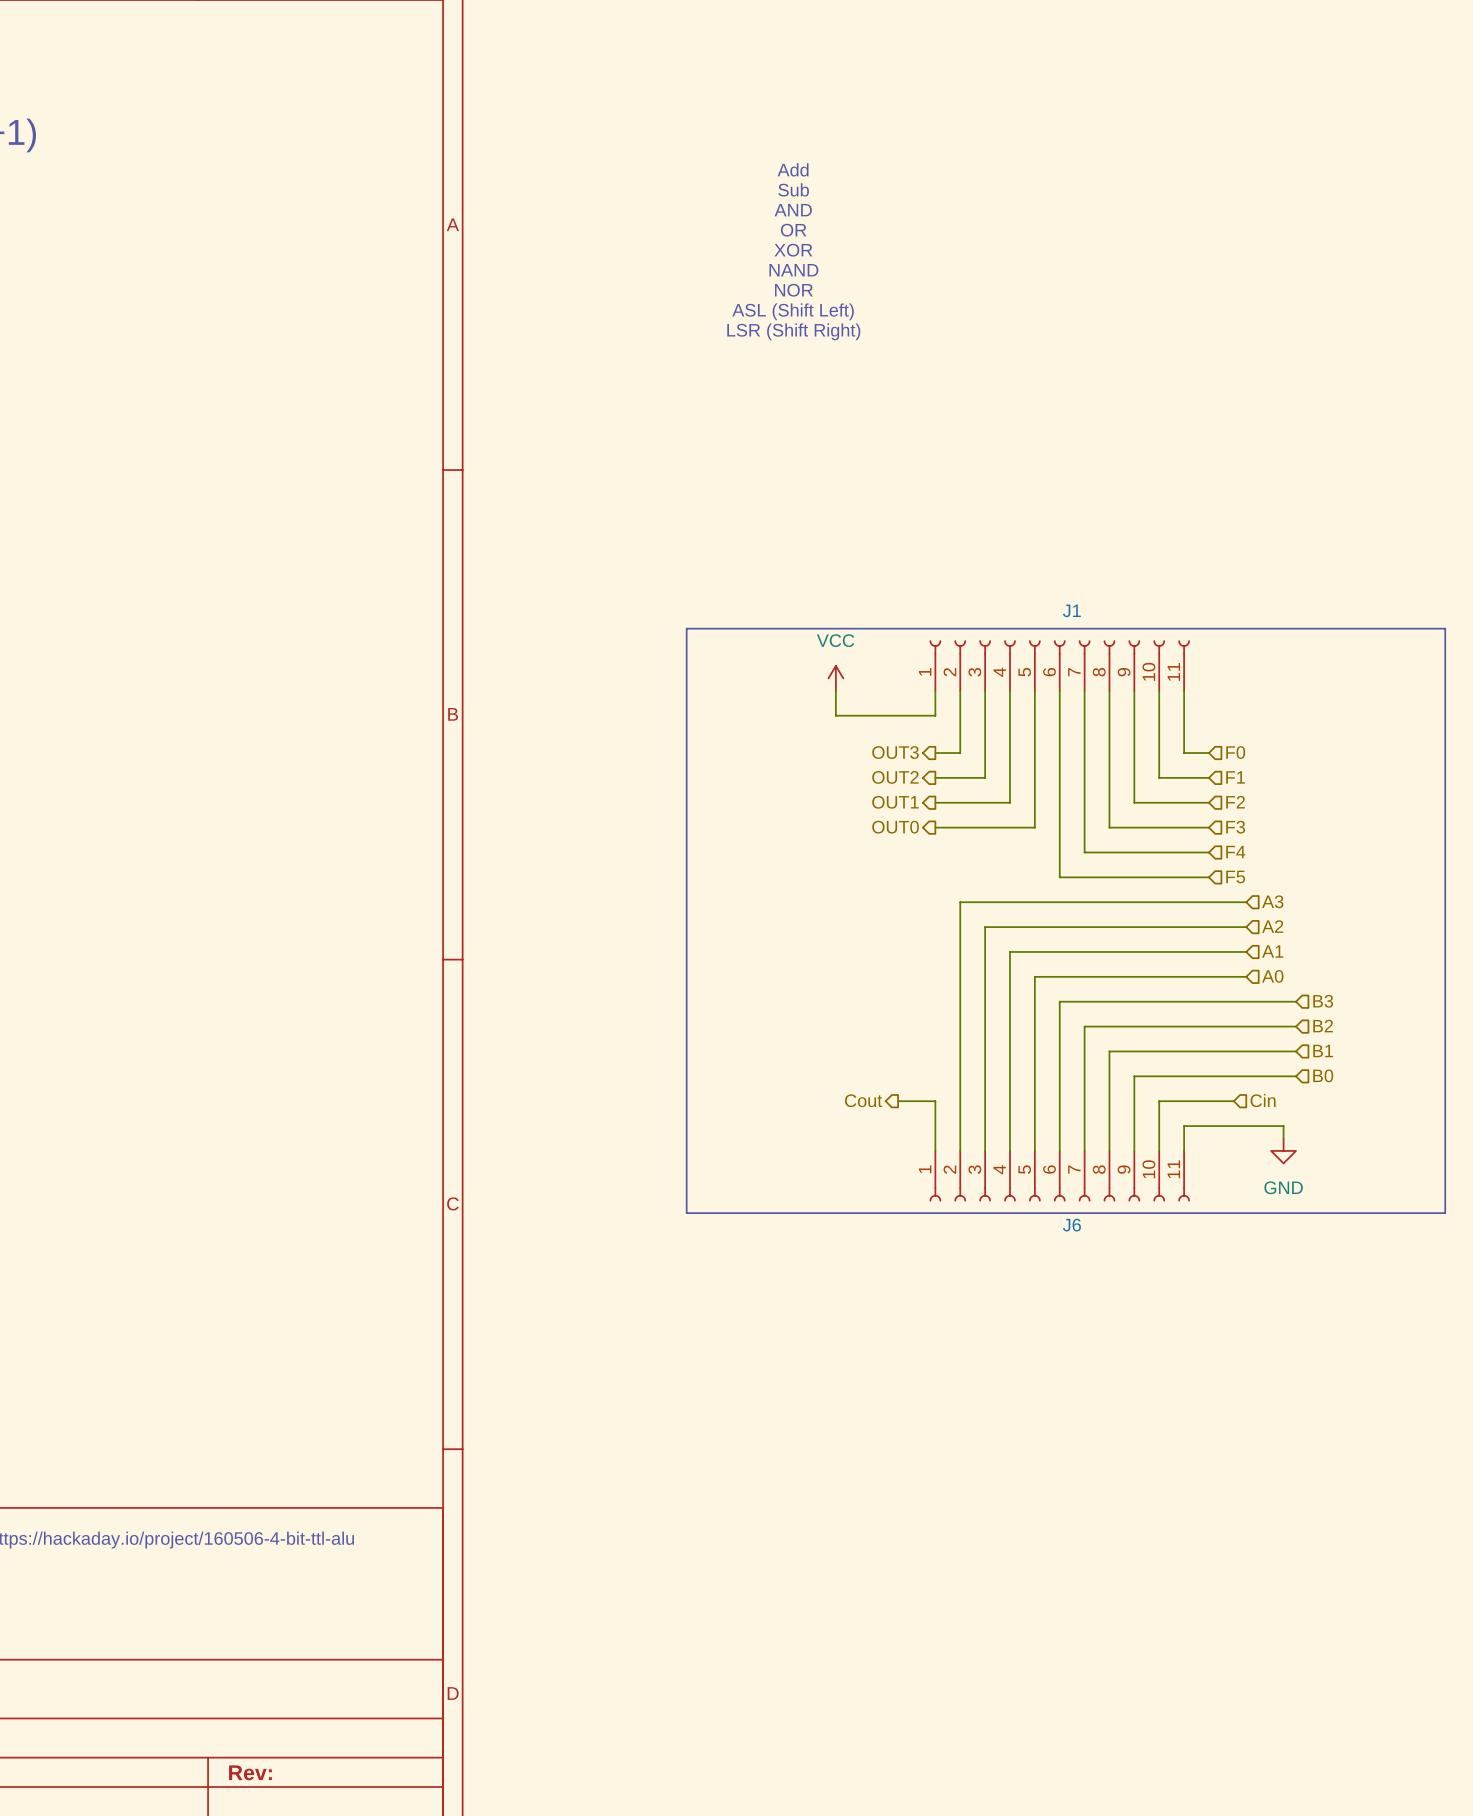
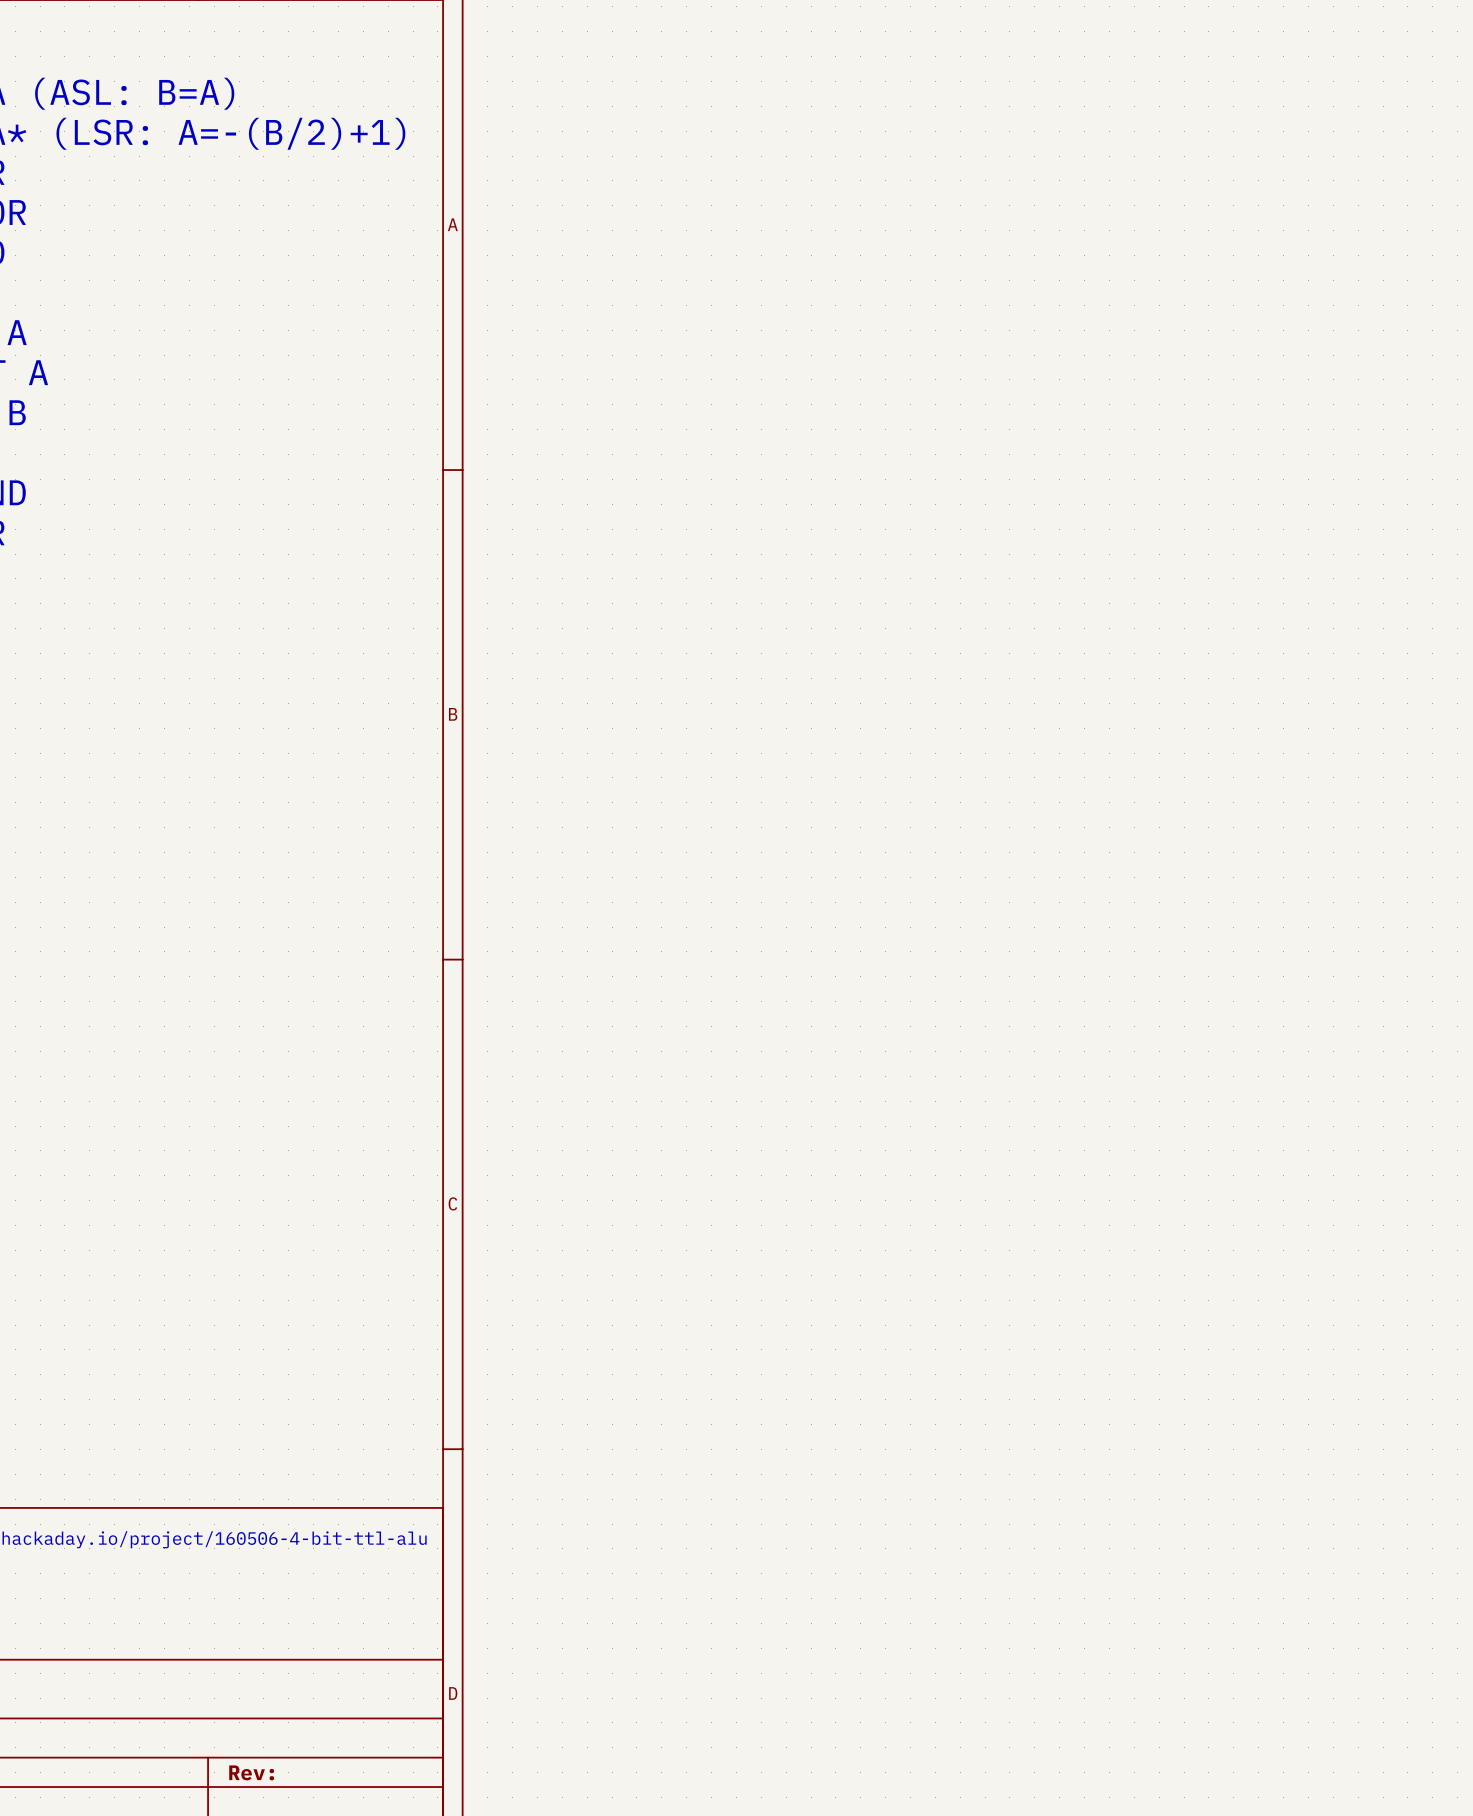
text: Add (793, 169) -> none
text: Sub (793, 189) -> none
text: AND (793, 210) -> none
text: OR (793, 230) -> none
text: XOR (793, 250) -> none
text: NAND (793, 270) -> none
text: NOR (793, 290) -> none
text: ASL (Shift Left) (793, 311) -> none
text: LSR (Shift Right) (793, 331) -> none
line: (686, 628) (1445, 628) (1445, 1213) (686, 1213) (686, 628) -> none
J1: (1059, 665) -> none
power symbol: VCC (835, 678) -> none
wire: (835, 690) (835, 715) (935, 715) (935, 690) -> none
wire: (960, 690) (960, 753) (935, 753) -> none
wire: (985, 690) (985, 777) (935, 777) -> none
wire: (1009, 690) (1009, 802) (935, 802) -> none
wire: (1034, 690) (1034, 827) (935, 827) -> none
wire: (1059, 690) (1059, 877) (1208, 877) -> none
wire: (1084, 690) (1084, 852) (1208, 852) -> none
wire: (1109, 690) (1109, 827) (1208, 827) -> none
wire: (1134, 690) (1134, 802) (1208, 802) -> none
wire: (1159, 690) (1159, 777) (1208, 777) -> none
wire: (1184, 690) (1184, 753) (1208, 753) -> none
hierarchical label: OUT3 (895, 752) -> none
hierarchical label: F0 (1235, 752) -> none
hierarchical label: OUT2 (895, 777) -> none
hierarchical label: F1 (1235, 777) -> none
hierarchical label: OUT1 (895, 802) -> none
hierarchical label: F2 (1235, 802) -> none
hierarchical label: OUT0 (895, 827) -> none
hierarchical label: F3 (1235, 827) -> none
hierarchical label: F4 (1235, 852) -> none
hierarchical label: F5 (1235, 876) -> none
hierarchical label: A3 (1272, 901) -> none
wire: (1246, 902) (960, 902) (960, 1150) -> none
hierarchical label: A2 (1272, 926) -> none
wire: (1246, 927) (985, 927) (985, 1150) -> none
wire: (1246, 951) (1009, 951) (1009, 1150) -> none
hierarchical label: A1 (1272, 951) -> none
wire: (1246, 976) (1034, 976) (1034, 1150) -> none
hierarchical label: A0 (1272, 976) -> none
wire: (1296, 1001) (1059, 1001) (1059, 1150) -> none
hierarchical label: B3 (1323, 1001) -> none
wire: (1296, 1026) (1084, 1026) (1084, 1150) -> none
hierarchical label: B2 (1323, 1026) -> none
hierarchical label: B1 (1323, 1050) -> none
wire: (1296, 1051) (1109, 1051) (1109, 1150) -> none
hierarchical label: B0 (1323, 1075) -> none
wire: (1296, 1076) (1134, 1076) (1134, 1150) -> none
hierarchical label: Cout (863, 1100) -> none
hierarchical label: Cin (1263, 1100) -> none
wire: (898, 1101) (935, 1101) (935, 1150) -> none
wire: (1233, 1101) (1159, 1101) (1159, 1150) -> none
wire: (1283, 1138) (1283, 1126) (1184, 1126) (1184, 1150) -> none
power symbol: GND (1283, 1150) -> none
J6: (1059, 1176) -> none

